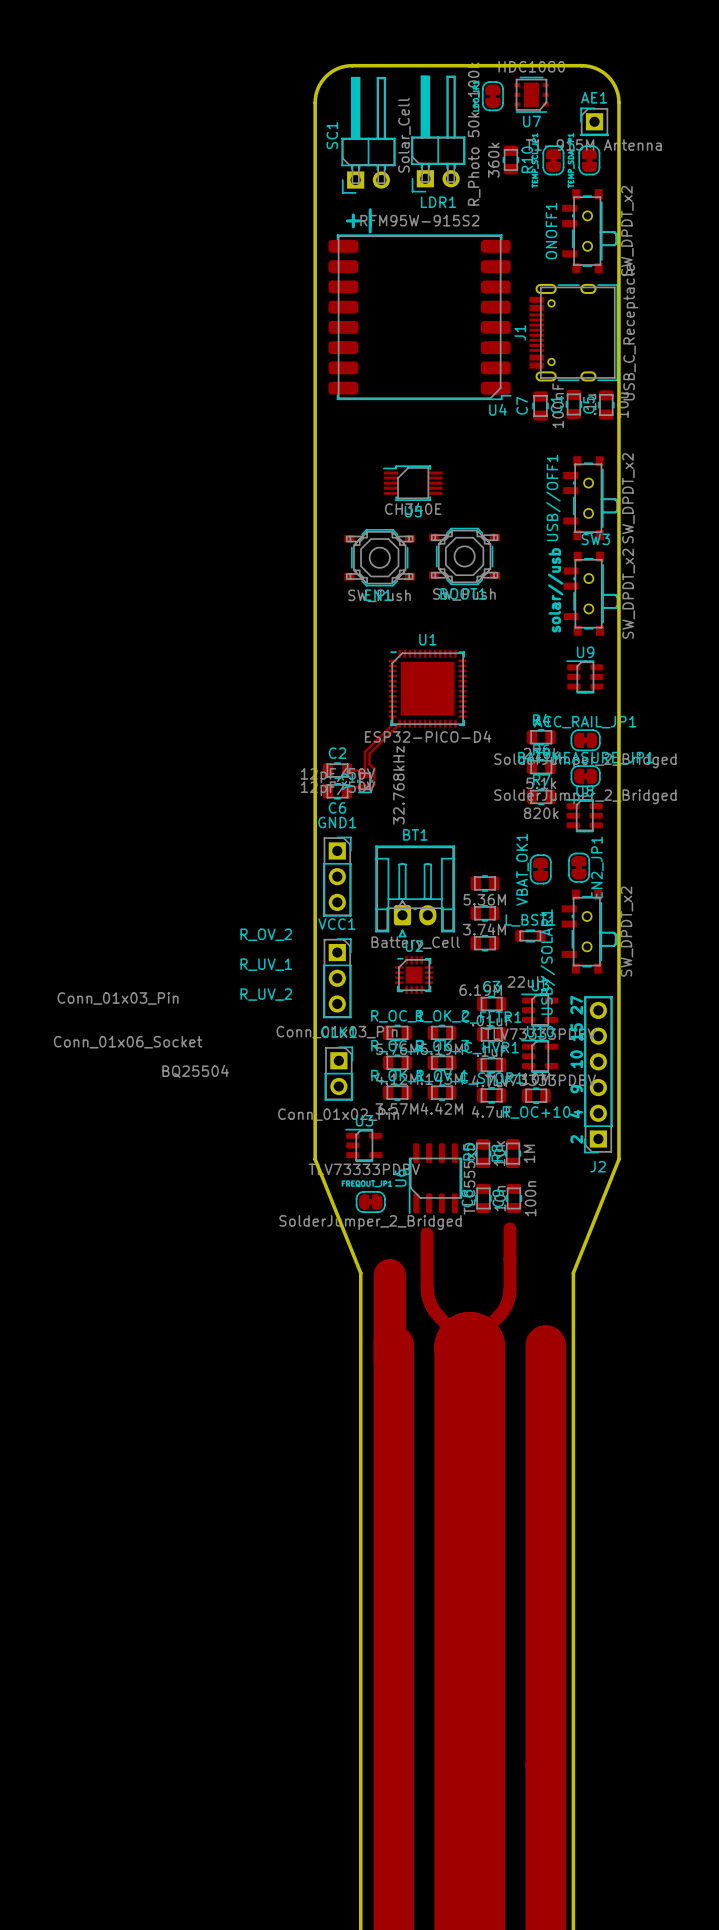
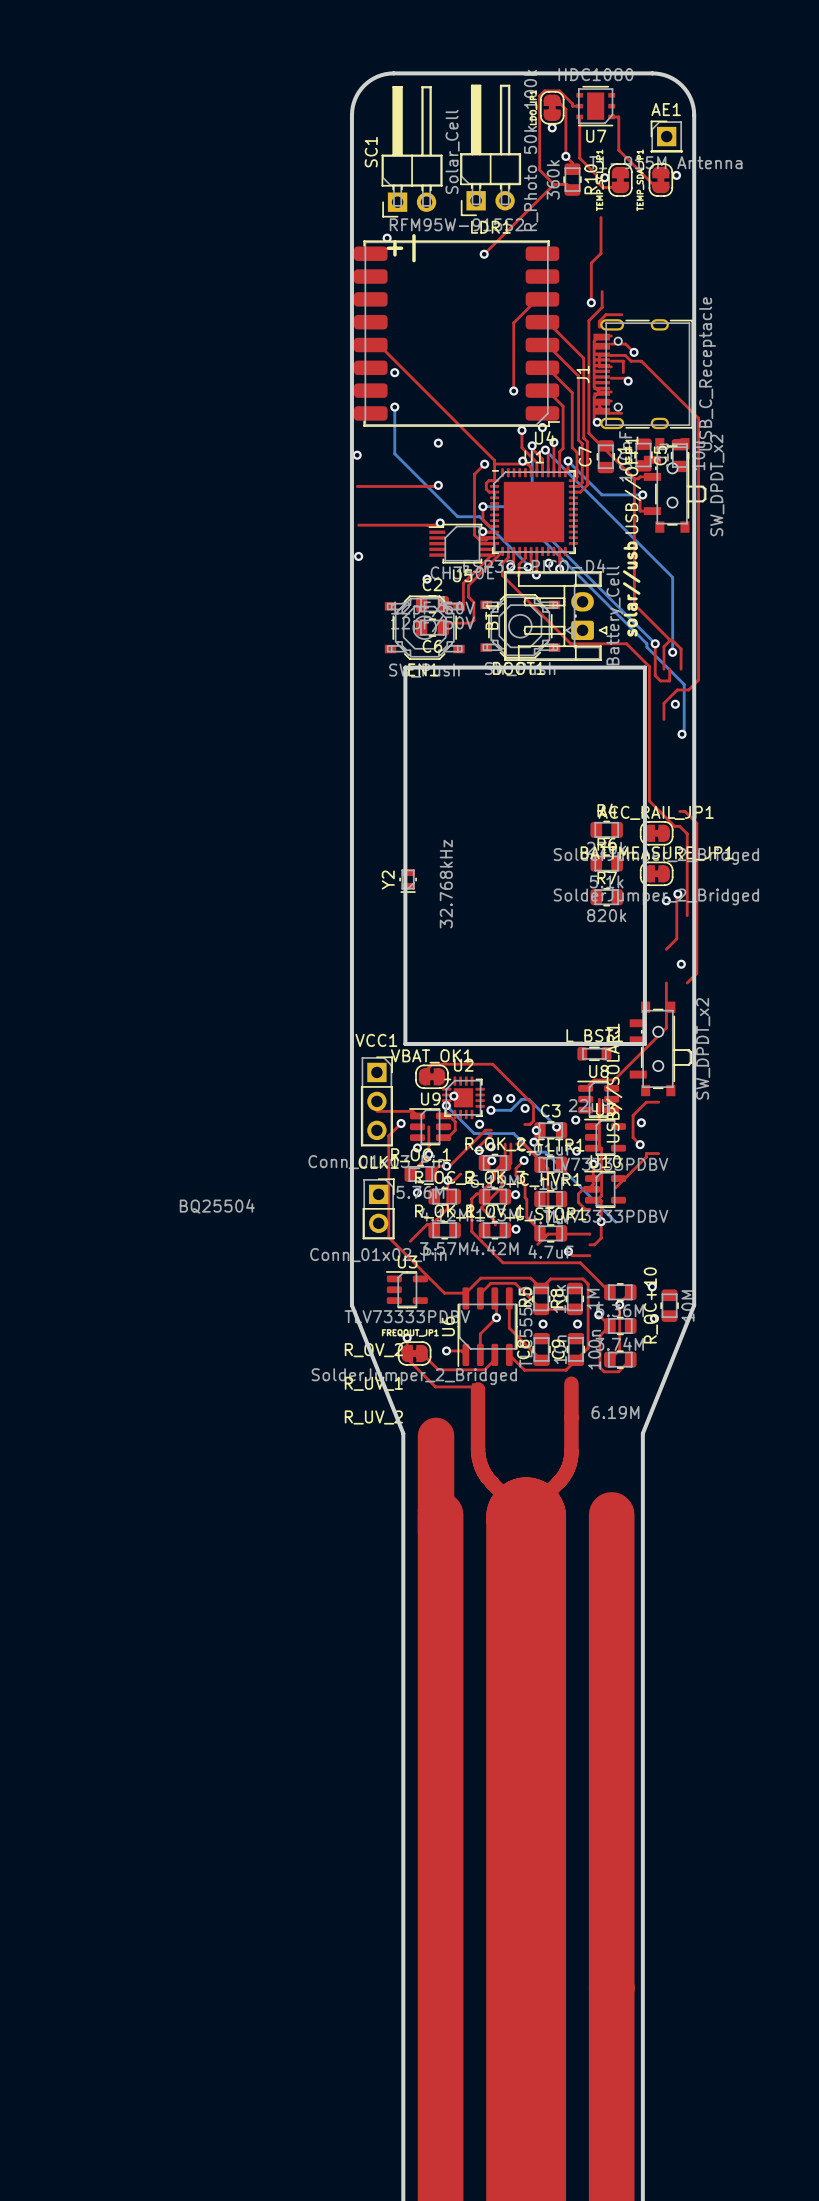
top track: none -> (552, 100) (556, 100) (565, 109) (565, 156) (572, 163) (572, 169)
top track: none -> (579, 106) (572, 106) (559, 90) (544, 90) (539, 95) (539, 170) (553, 184)
top track: none -> (579, 116) (579, 158) (596, 174) (596, 181) (602, 187) (620, 187)
top track: none -> (611, 116) (618, 116) (618, 150) (656, 187) (660, 187)
via: none -> (552, 127)
via: none -> (565, 156)
via: none -> (676, 175)
via: none -> (604, 177)
top track: none -> (553, 184) (484, 254)
top track: none -> (553, 184) (566, 184) (572, 189)
top track: none -> (601, 217) (601, 253) (591, 263) (591, 302)
via: none -> (387, 238)
via: none -> (484, 254)
ONOFF1: SW_DPDT_x2 (589, 231) -> none
top track: none -> (602, 291) (602, 307) (588, 320) (588, 433) (634, 478)
top track: none -> (542, 299) (537, 299) (513, 322) (513, 391)
via: none -> (591, 302)
top track: none -> (621, 314) (606, 314) (599, 321) (599, 326) (611, 326)
top track: none -> (542, 322) (547, 322) (583, 358) (583, 438) (587, 441) (587, 485) (580, 492) (573, 492)
top track: none -> (611, 336) (599, 336) (594, 341) (594, 386) (599, 391)
top track: none -> (611, 344) (625, 344) (634, 352)
top track: none -> (370, 345) (379, 345) (494, 460) (494, 480) (488, 480) (486, 483) (486, 489) (489, 492) (494, 492) (494, 497)
top track: none -> (542, 345) (547, 345) (578, 376) (578, 440) (582, 443) (582, 482) (578, 486) (573, 486)
via: none -> (634, 352)
U4 position: (419, 317) -> (456, 333)
top track: none -> (611, 361) (623, 361) (623, 372)
top track: none -> (611, 366) (599, 366) (599, 355) (625, 355) (631, 361) (641, 361) (698, 418) (698, 680) (688, 689) (677, 689) (663, 703) (663, 719)
top track: none -> (542, 367) (547, 367) (572, 392) (572, 447) (577, 452) (577, 477) (573, 480)
via: none -> (394, 372)
top track: none -> (611, 378) (625, 378) (628, 381)
via: none -> (628, 381)
via: none -> (513, 391)
top track: none -> (542, 390) (547, 390) (563, 406) (563, 448) (559, 451) (559, 472)
top track: none -> (599, 391) (594, 397) (594, 419) (597, 422)
top track: none -> (599, 391) (611, 391)
top track: none -> (611, 401) (599, 401) (599, 406) (606, 413) (621, 413)
bottom track: none -> (394, 407) (394, 453) (457, 516) (479, 516) (528, 567)
via: none -> (394, 407)
via: none -> (597, 422)
via: none -> (542, 427)
top track: none -> (521, 430) (521, 447) (536, 462) (536, 472)
via: none -> (521, 430)
via: none -> (438, 443)
top track: none -> (553, 442) (553, 472)
via: none -> (553, 442)
top track: none -> (532, 445) (532, 448) (542, 459) (542, 472)
bottom track: none -> (532, 445) (532, 520) (655, 643)
via: none -> (532, 445)
top track: none -> (545, 450) (548, 452) (548, 472)
bottom track: none -> (545, 450) (672, 577) (672, 652)
via: none -> (545, 450)
via: none -> (357, 455)
via: none -> (522, 461)
top track: none -> (568, 461) (568, 469) (565, 472)
bottom track: none -> (568, 461) (601, 494) (642, 494)
via: none -> (568, 461)
top track: none -> (484, 464) (474, 474) (474, 535) (479, 540) (494, 537)
via: none -> (484, 464)
top track: none -> (494, 464) (527, 464) (531, 467) (531, 472)
top track: none -> (652, 476) (634, 478)
top track: none -> (634, 478) (634, 604) (670, 640)
top track: none -> (438, 485) (357, 486)
via: none -> (438, 485)
top track: none -> (642, 494) (640, 497) (640, 511) (652, 511)
via: none -> (642, 494)
top track: none -> (482, 506) (482, 519) (489, 526) (494, 526)
bottom track: none -> (482, 506) (509, 506) (646, 643) (646, 647) (684, 684) (684, 732) (682, 734)
via: none -> (482, 506)
top track: none -> (440, 523) (436, 525) (358, 525)
via: none -> (440, 523)
via: none -> (482, 531)
top track: none -> (502, 551) (468, 585) (468, 596) (473, 602) (473, 620) (471, 623) (447, 623) (443, 627)
top track: none -> (508, 551) (508, 557) (502, 563) (502, 575) (570, 643) (626, 643) (649, 666) (649, 801) (674, 826) (679, 826) (687, 833) (687, 915)
top track: none -> (514, 551) (513, 563) (510, 566)
top track: none -> (525, 551) (525, 558) (519, 564) (518, 575)
top track: none -> (531, 551) (531, 564) (528, 567)
top track: none -> (536, 551) (536, 574)
top track: none -> (559, 551) (559, 568)
via: none -> (358, 556)
USB//OFF1 position: (590, 498) -> (675, 485)
via: none -> (548, 563)
via: none -> (510, 566)
via: none -> (528, 567)
via: none -> (559, 568)
via: none -> (536, 574)
via: none -> (427, 579)
top track: none -> (670, 640) (663, 646) (663, 669)
top track: none -> (670, 640) (681, 648) (681, 669)
top track: none -> (655, 643) (655, 675) (660, 680) (669, 680) (669, 669)
via: none -> (655, 643)
via: none -> (672, 652)
text position: solar//usb (555, 590) -> solar//usb (631, 589)
board edge: none -> (405, 667) (405, 1044) (644, 1044) (644, 667) (405, 667)
SW3: SW_DPDT_x2 (591, 593) -> none
via: none -> (675, 704)
via: none -> (682, 734)
U9 position: (585, 676) -> (430, 1126)
U1 position: (427, 688) -> (533, 512)
top track: (392, 716) (392, 724) (364, 752) (364, 775) (360, 770) (347, 770) -> (494, 543) (494, 552) (463, 583) (463, 609) (458, 604) (443, 604)
top track: none -> (679, 811) (685, 811) (696, 823) (696, 973) (687, 982)
top track: (399, 723) (369, 753) (369, 764) (374, 768) (374, 784) (371, 787) (351, 787) -> none
C2 position: (337, 770) -> (432, 604)
C6 position: (337, 791) -> (432, 627)
top track: none -> (677, 894) (676, 938) (666, 949)
via: none -> (677, 894)
via: none -> (666, 900)
U8 position: (584, 815) -> (598, 1099)
via: none -> (681, 964)
EN2_JP1: (579, 867) -> none
VBAT_OK1 rotation: 0° (540, 869) -> 90° clockwise (431, 1076)
VBAT_OK1 position: (540, 869) -> (431, 1076)
top track: none -> (666, 982) (666, 1027) (614, 1080) (594, 1080) (585, 1088)
GND1: Conn_01x03_Pin (337, 876) -> none
R_OV_2 position: (485, 883) -> (620, 1292)
BT1 rotation: 0° (415, 891) -> 90° counterclockwise (555, 616)
BT1 position: (415, 891) -> (555, 616)
R_UV_1 position: (485, 913) -> (620, 1325)
R_UV_2 position: (485, 943) -> (620, 1359)
top track: none -> (424, 1076) (424, 1072) (432, 1064) (492, 1064) (533, 1105) (533, 1121) (529, 1124) (524, 1124)
via: none -> (453, 1096)
via: none -> (497, 1098)
via: none -> (510, 1098)
top track: none -> (599, 1099) (601, 1195) (598, 1198) (601, 1200) (601, 1238) (594, 1244) (589, 1244)
top track: none -> (658, 1102) (646, 1102) (633, 1115) (633, 1137) (640, 1144)
bottom track: none -> (446, 1105) (474, 1133) (513, 1133) (532, 1152) (545, 1152) (615, 1222)
via: none -> (446, 1105)
via: none -> (525, 1108)
bottom track: none -> (490, 1110) (510, 1110) (521, 1099) (529, 1099) (556, 1127)
via: none -> (490, 1110)
top track: none -> (376, 1111) (412, 1111) (417, 1115)
top track: none -> (443, 1115) (446, 1113) (455, 1121) (455, 1130) (447, 1137) (443, 1137)
via: none -> (575, 1120)
top track: none -> (401, 1123) (388, 1135) (388, 1237) (444, 1293) (465, 1293)
via: none -> (401, 1123)
via: none -> (641, 1122)
via: none -> (479, 1124)
top track: none -> (428, 1126) (428, 1155) (410, 1173)
via: none -> (556, 1127)
top track: none -> (491, 1130) (485, 1130) (449, 1166) (438, 1166) (431, 1173)
via: none -> (536, 1130)
top track: none -> (491, 1135) (479, 1146) (479, 1150)
via: none -> (534, 1142)
top track: none -> (505, 1144) (505, 1160) (494, 1171) (494, 1178) (471, 1198) (471, 1231) (502, 1262) (580, 1262) (609, 1292)
top track: none -> (510, 1144) (510, 1163) (501, 1172) (501, 1187) (481, 1207) (495, 1221) (495, 1225)
top track: none -> (516, 1144) (523, 1144) (547, 1168) (547, 1221)
via: none -> (640, 1144)
via: none -> (491, 1146)
via: none -> (417, 1147)
via: none -> (479, 1150)
via: none -> (576, 1151)
top track: none -> (658, 1153) (646, 1153) (646, 1157) (615, 1187)
via: none -> (428, 1154)
via: none -> (491, 1160)
top track: none -> (524, 1160) (516, 1168) (516, 1175) (525, 1184) (526, 1217) (545, 1236)
via: none -> (524, 1160)
R_OC_1 position: (397, 1032) -> (420, 1173)
top track: none -> (593, 1164) (593, 1184) (589, 1187) (584, 1187) (578, 1193) (578, 1202) (585, 1209) (589, 1209)
via: none -> (593, 1164)
via: none -> (446, 1166)
top track: none -> (460, 1173) (454, 1180) (447, 1180) (447, 1208) (431, 1224) (427, 1224) (410, 1241)
via: none -> (447, 1180)
via: none -> (417, 1192)
via: none -> (515, 1194)
text: 2 4 9 10 15 27 (576, 1069) -> none
J2: Conn_01x06_Socket (598, 1074) -> none
via: none -> (601, 1221)
via: none -> (516, 1229)
R_OC+10 rotation: 0° (536, 1095) -> 90° clockwise (669, 1305)
R_OC+10 position: (536, 1095) -> (669, 1305)
top track: none -> (589, 1234) (548, 1234) (537, 1244)
top track: none -> (568, 1251) (572, 1255) (589, 1255)
via: none -> (568, 1251)
via: none -> (652, 1286)
top track: none -> (630, 1292) (619, 1303) (619, 1349) (609, 1359)
top track: none -> (465, 1293) (480, 1278) (530, 1278) (541, 1288) (550, 1278) (582, 1278) (588, 1284) (588, 1348) (566, 1370) (524, 1370) (509, 1354)
top track: none -> (480, 1298) (480, 1293) (490, 1283) (515, 1283) (541, 1309) (574, 1309)
top track: none -> (494, 1298) (496, 1300) (496, 1317) (480, 1333) (480, 1354)
top track: none -> (509, 1298) (509, 1328) (541, 1360)
via: none -> (619, 1304)
top track: none -> (598, 1314) (609, 1325) (599, 1335) (599, 1367) (604, 1371) (618, 1371) (630, 1359)
via: none -> (598, 1314)
via: none -> (496, 1317)
via: none -> (654, 1318)
via: none -> (543, 1324)
via: none -> (577, 1324)
top track: none -> (407, 1337) (407, 1358) (435, 1386) (475, 1386)
via: none -> (407, 1337)
top track: none -> (446, 1350) (461, 1350) (465, 1354)
via: none -> (446, 1350)
top track: none -> (422, 1353) (438, 1369) (484, 1369) (494, 1359) (494, 1354)

